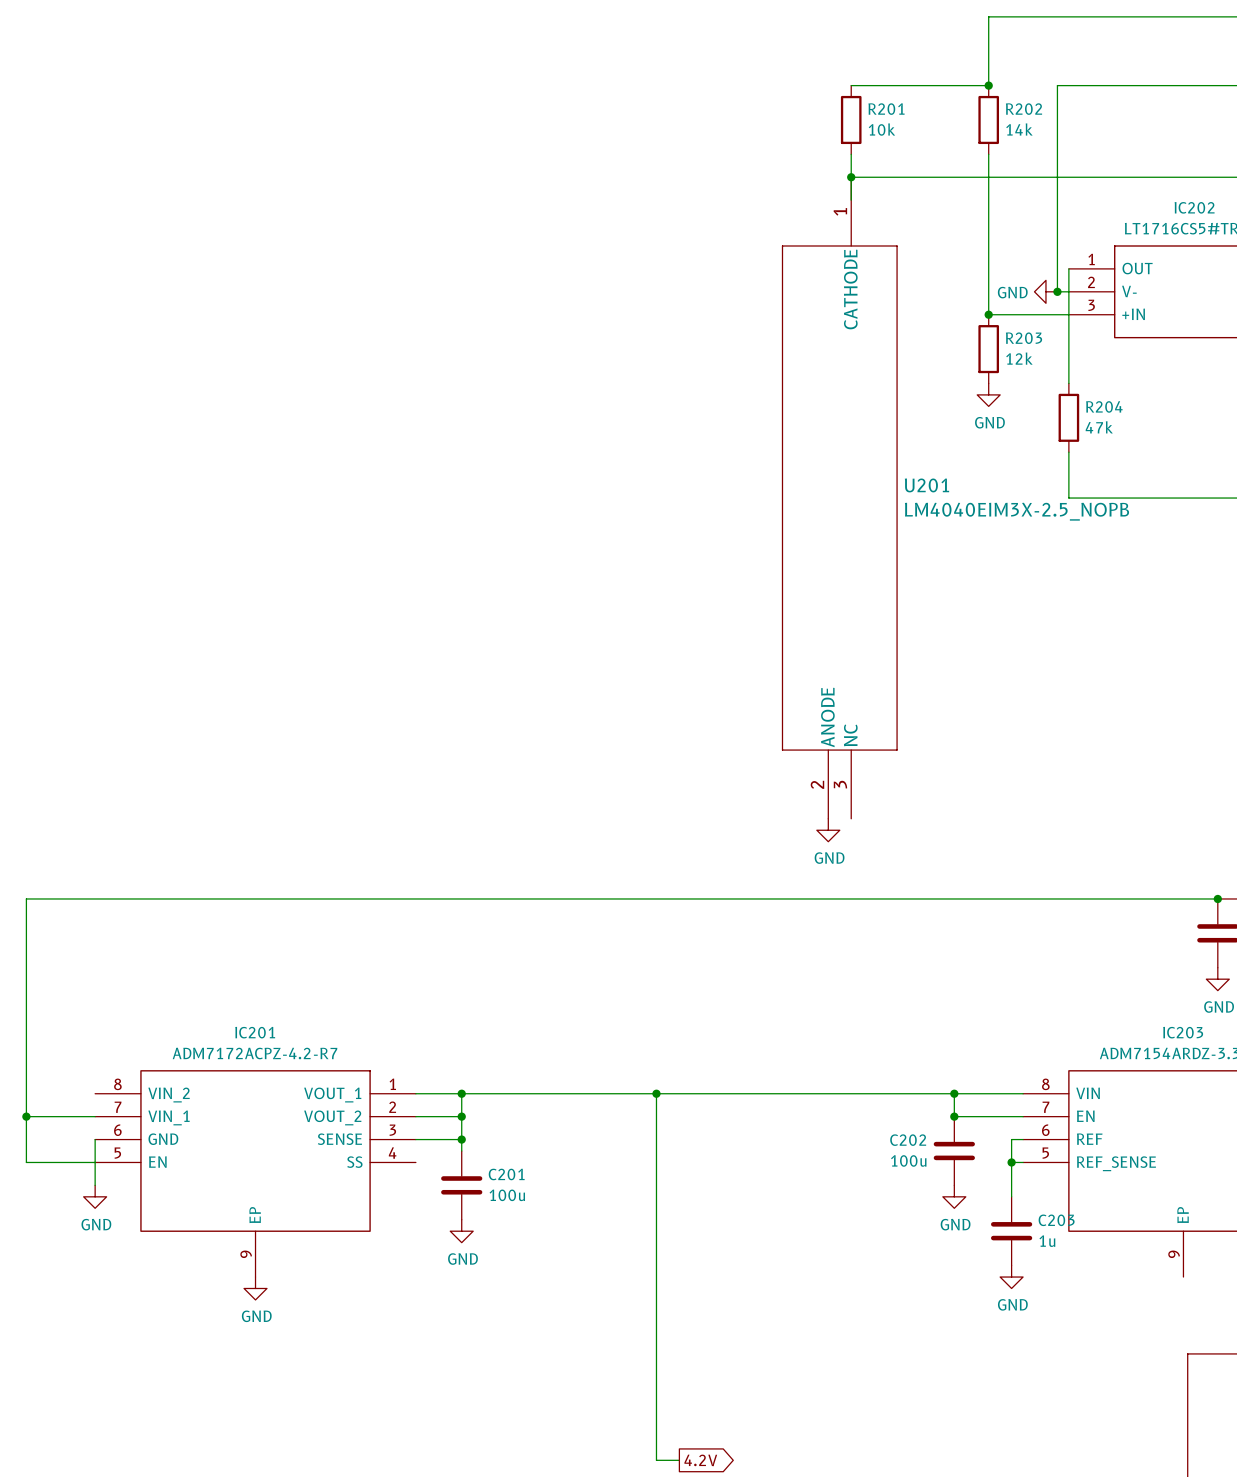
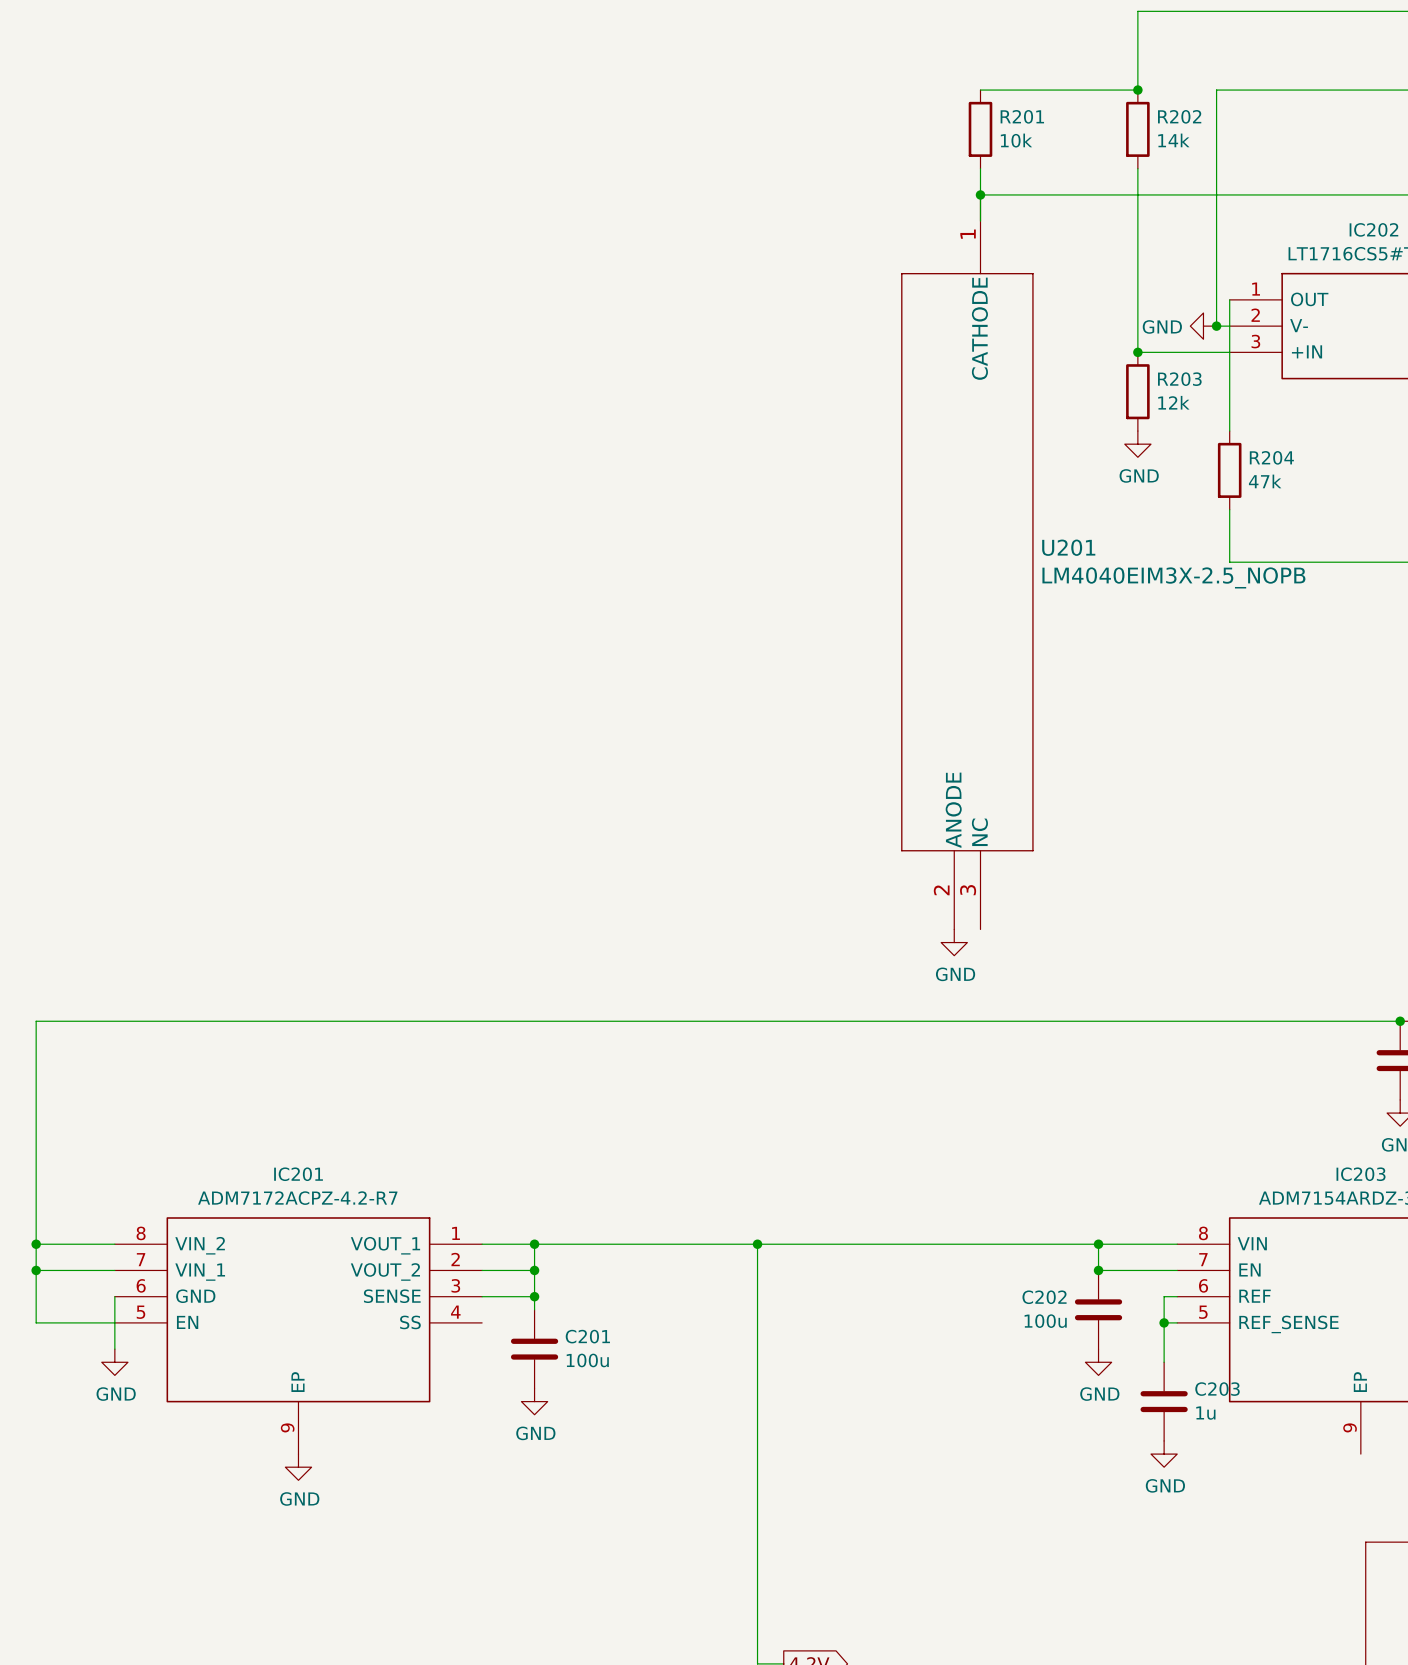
wire: none -> (36, 1244) (114, 1244)
junction: none -> (36, 1244)

